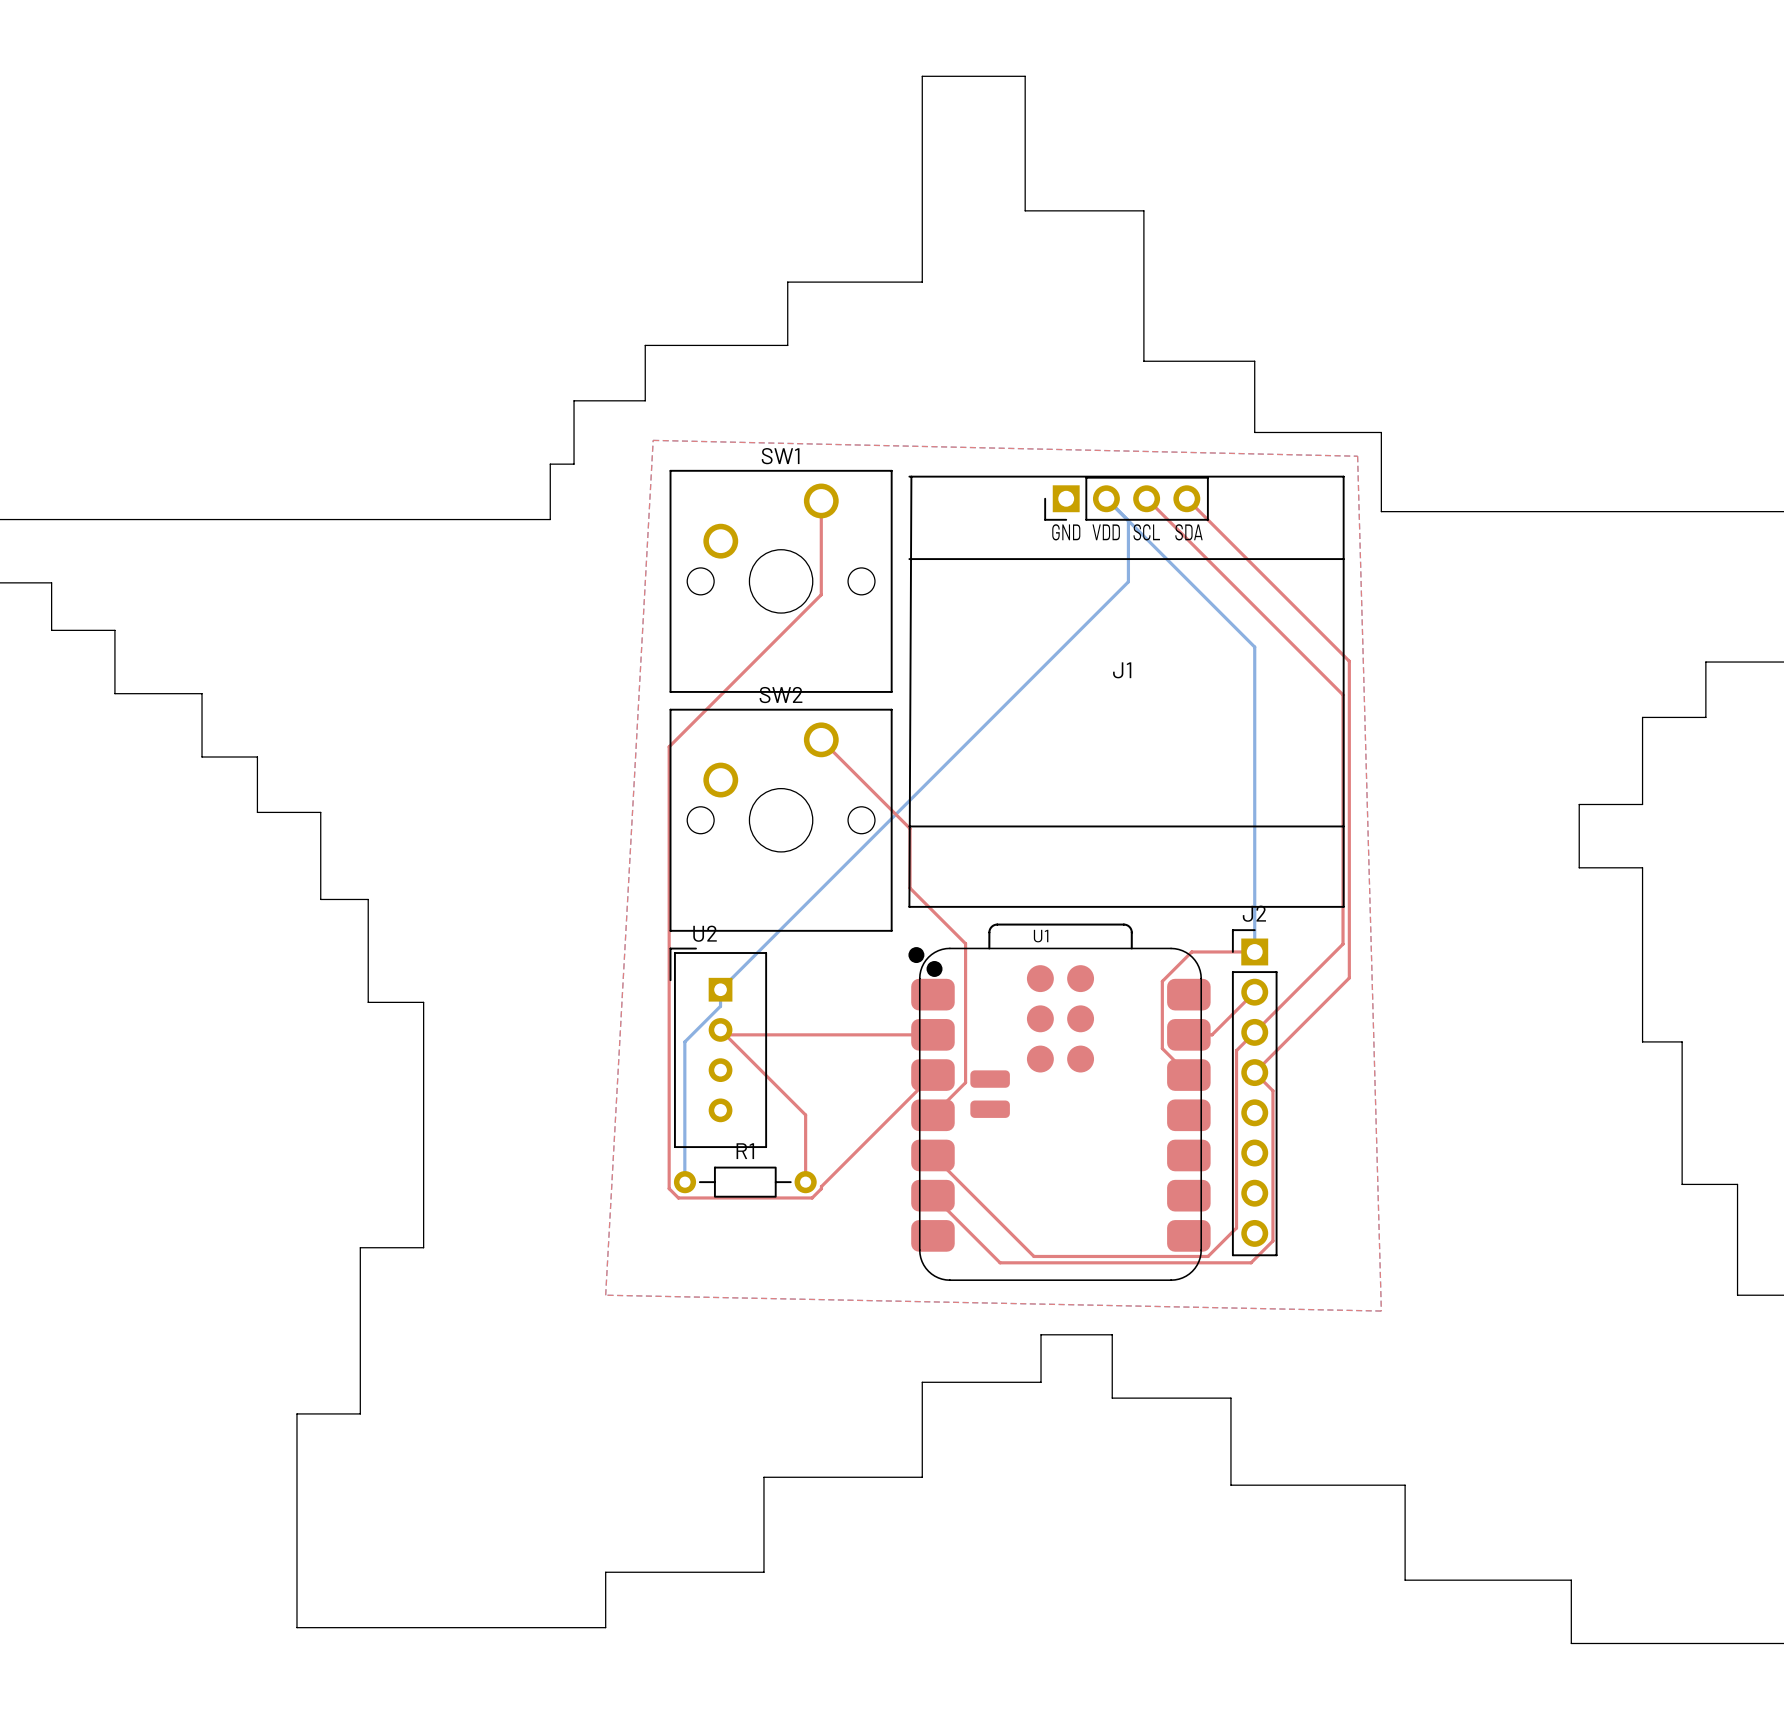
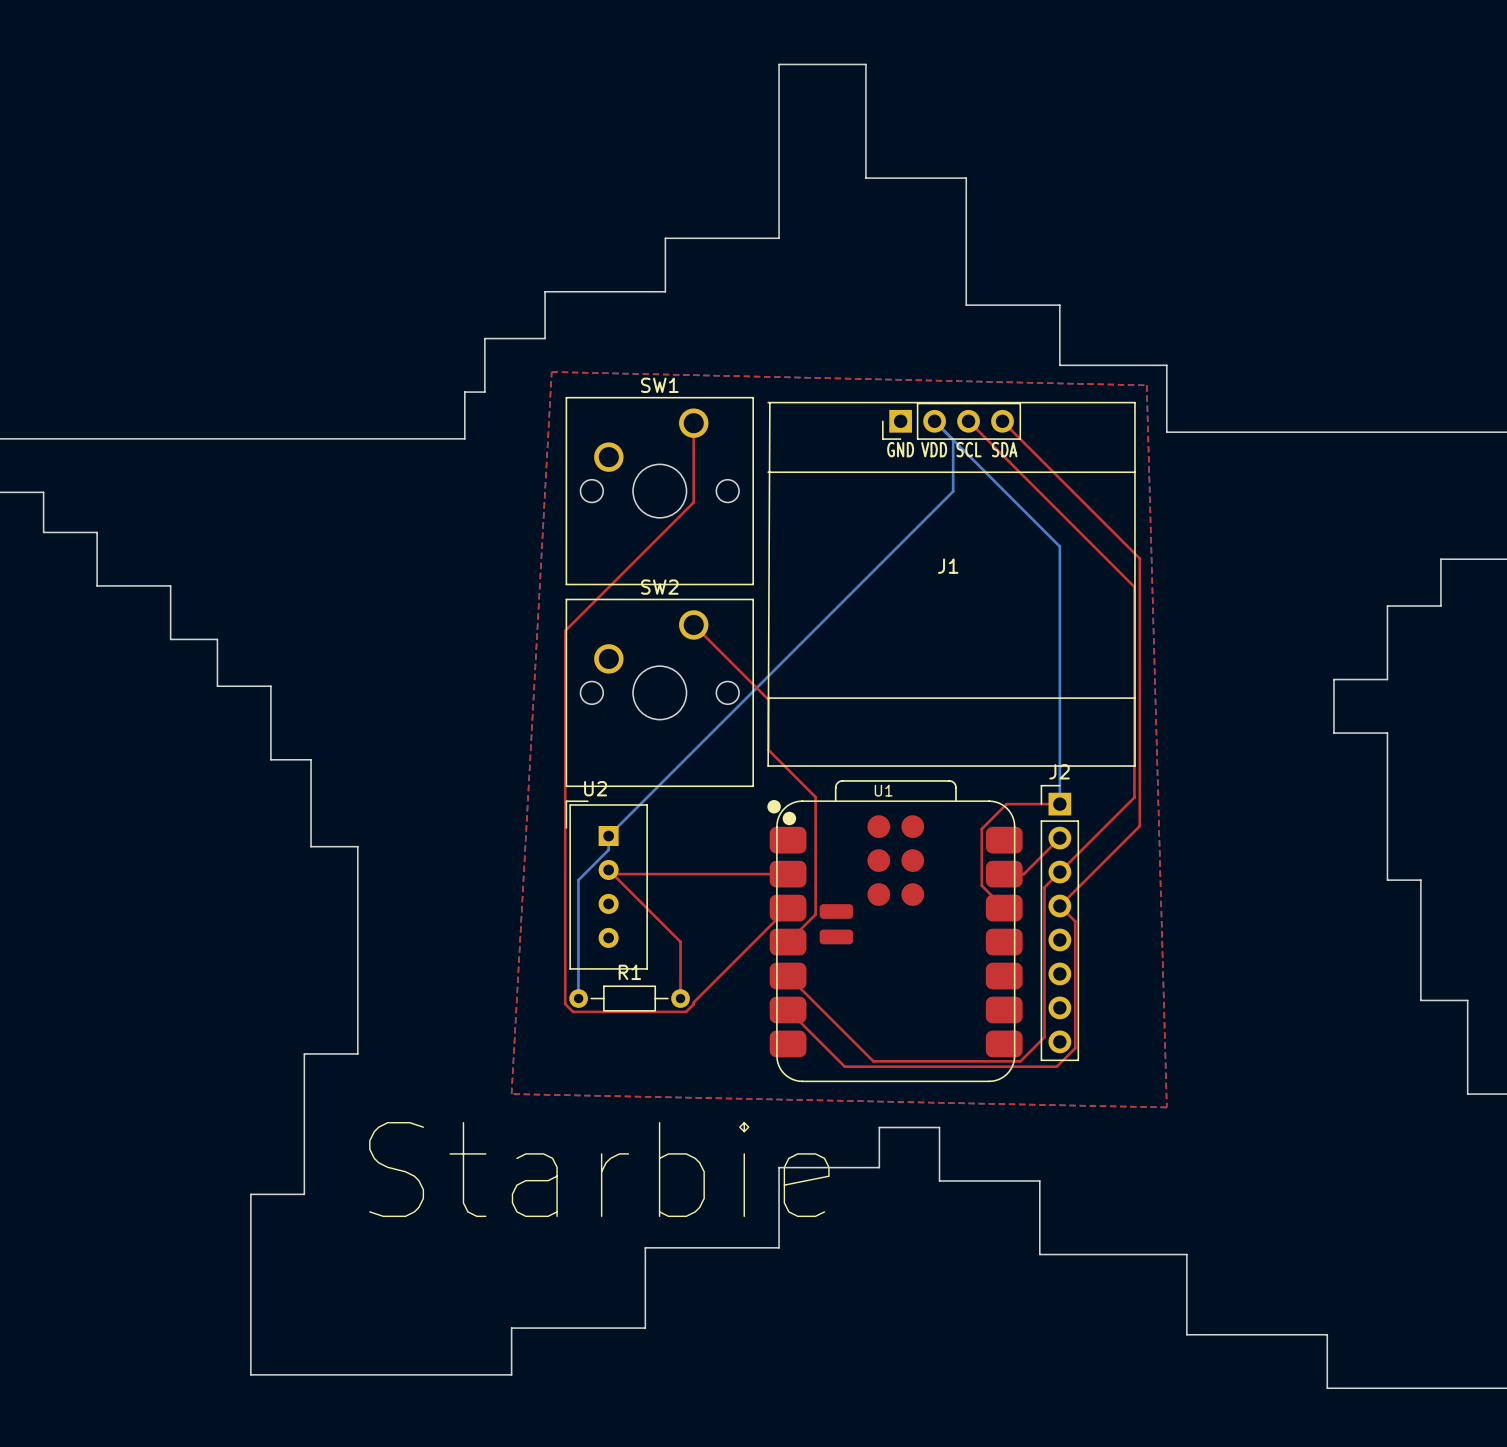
text: none -> Starbie (599, 1169)

